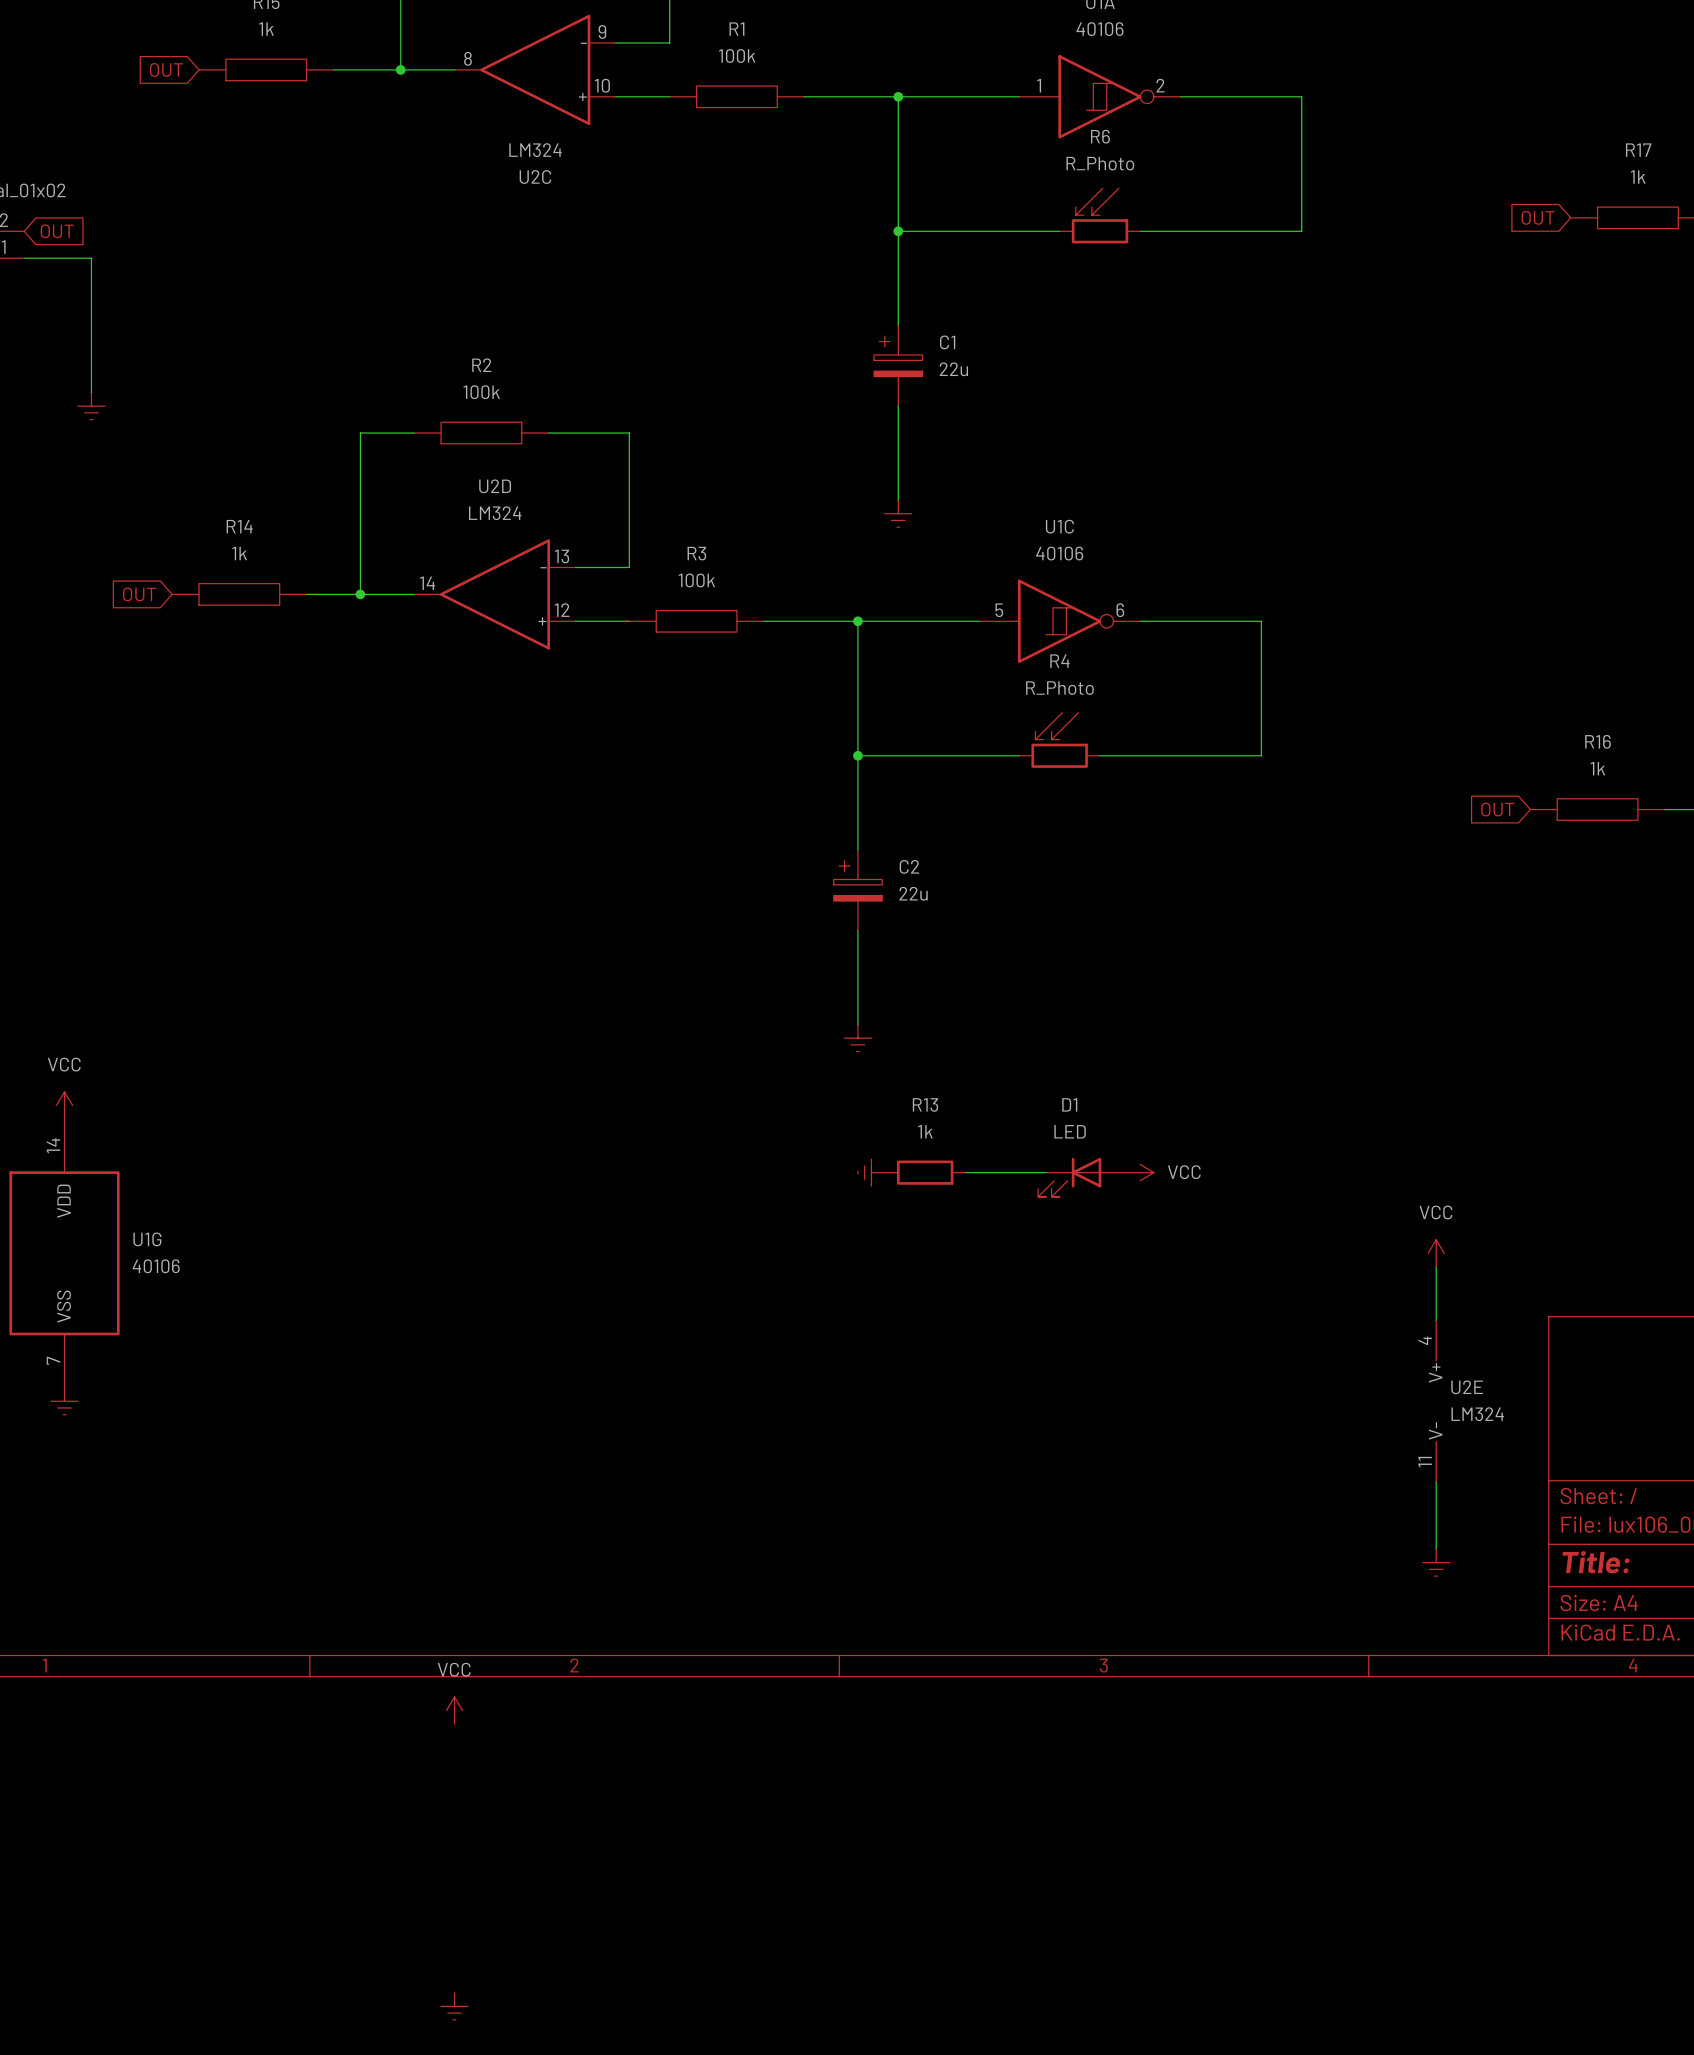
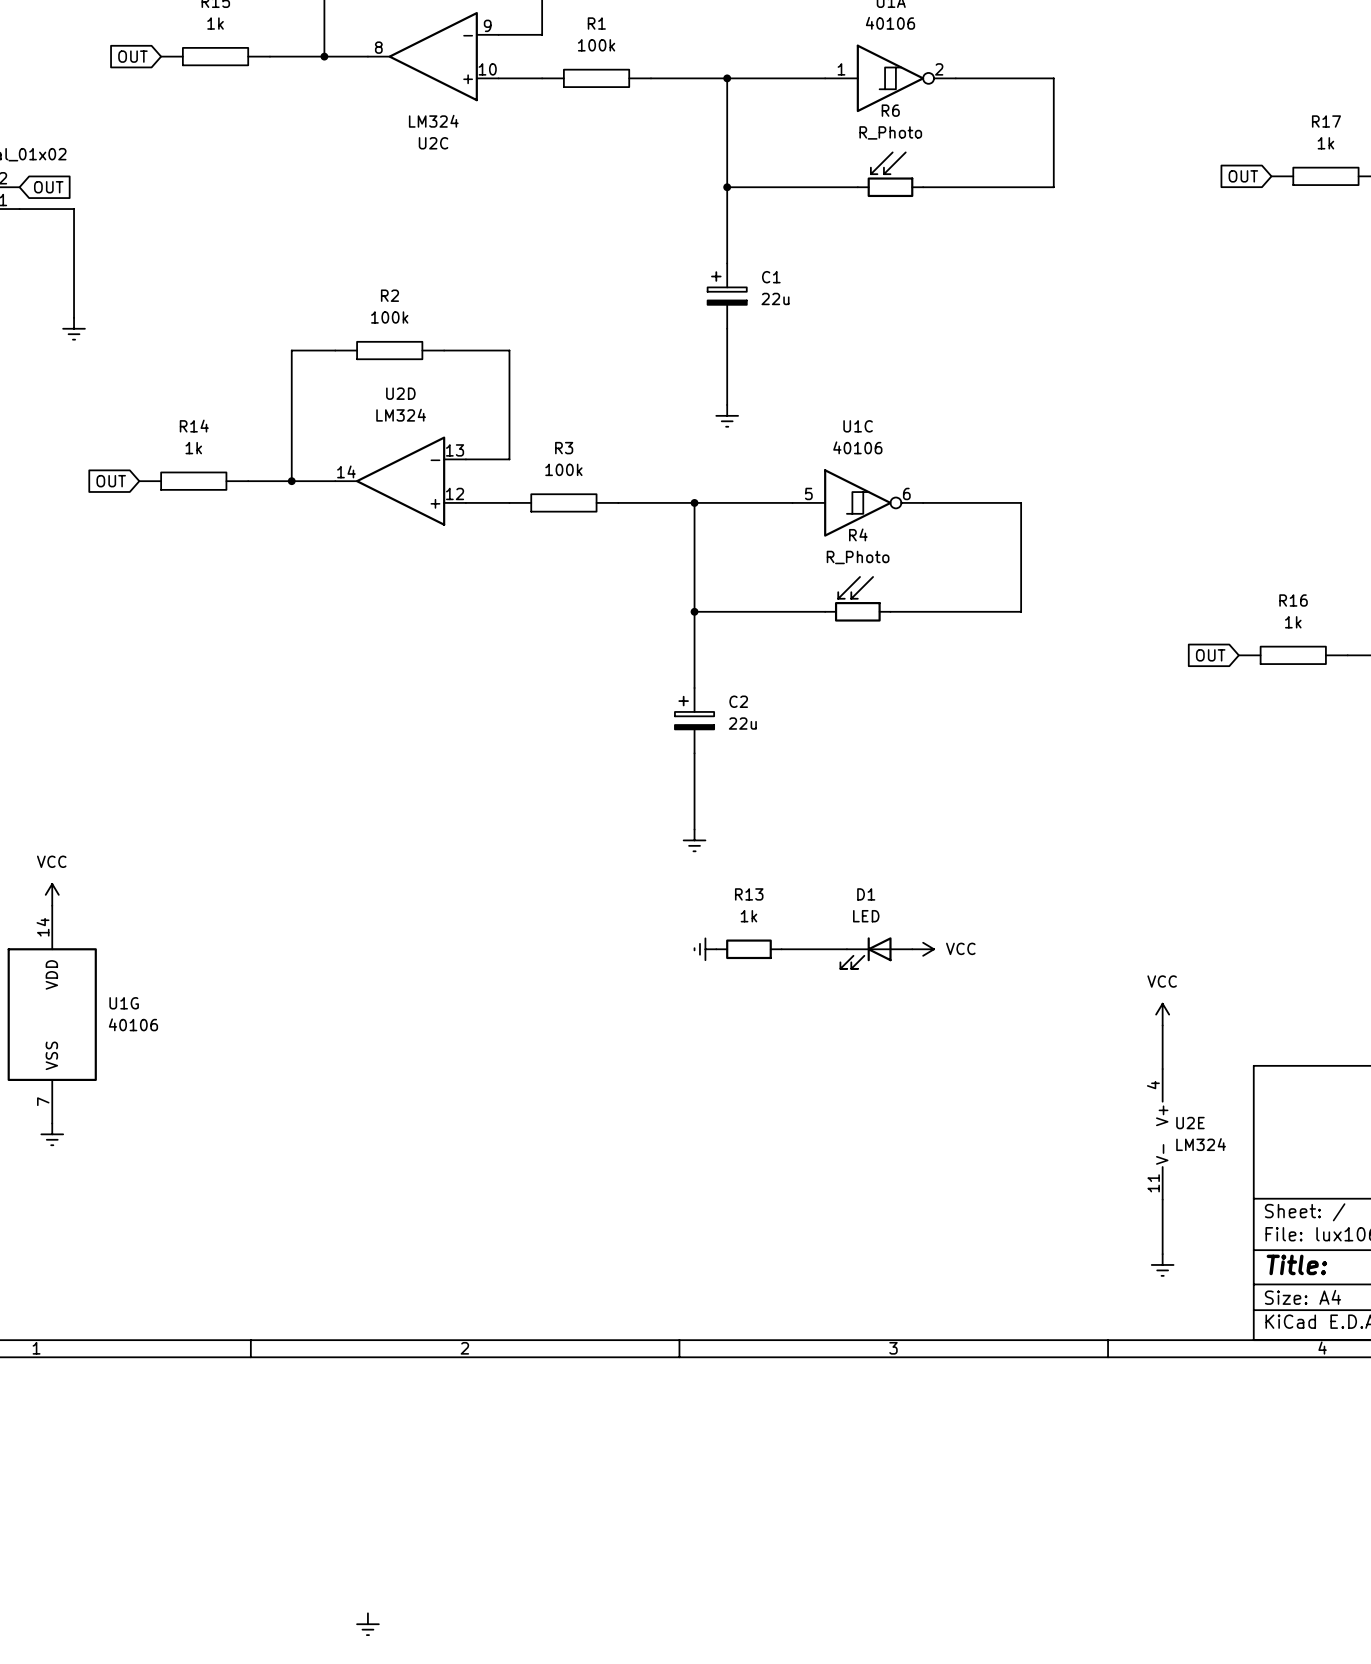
power symbol: VCC (454, 1710) -> none

